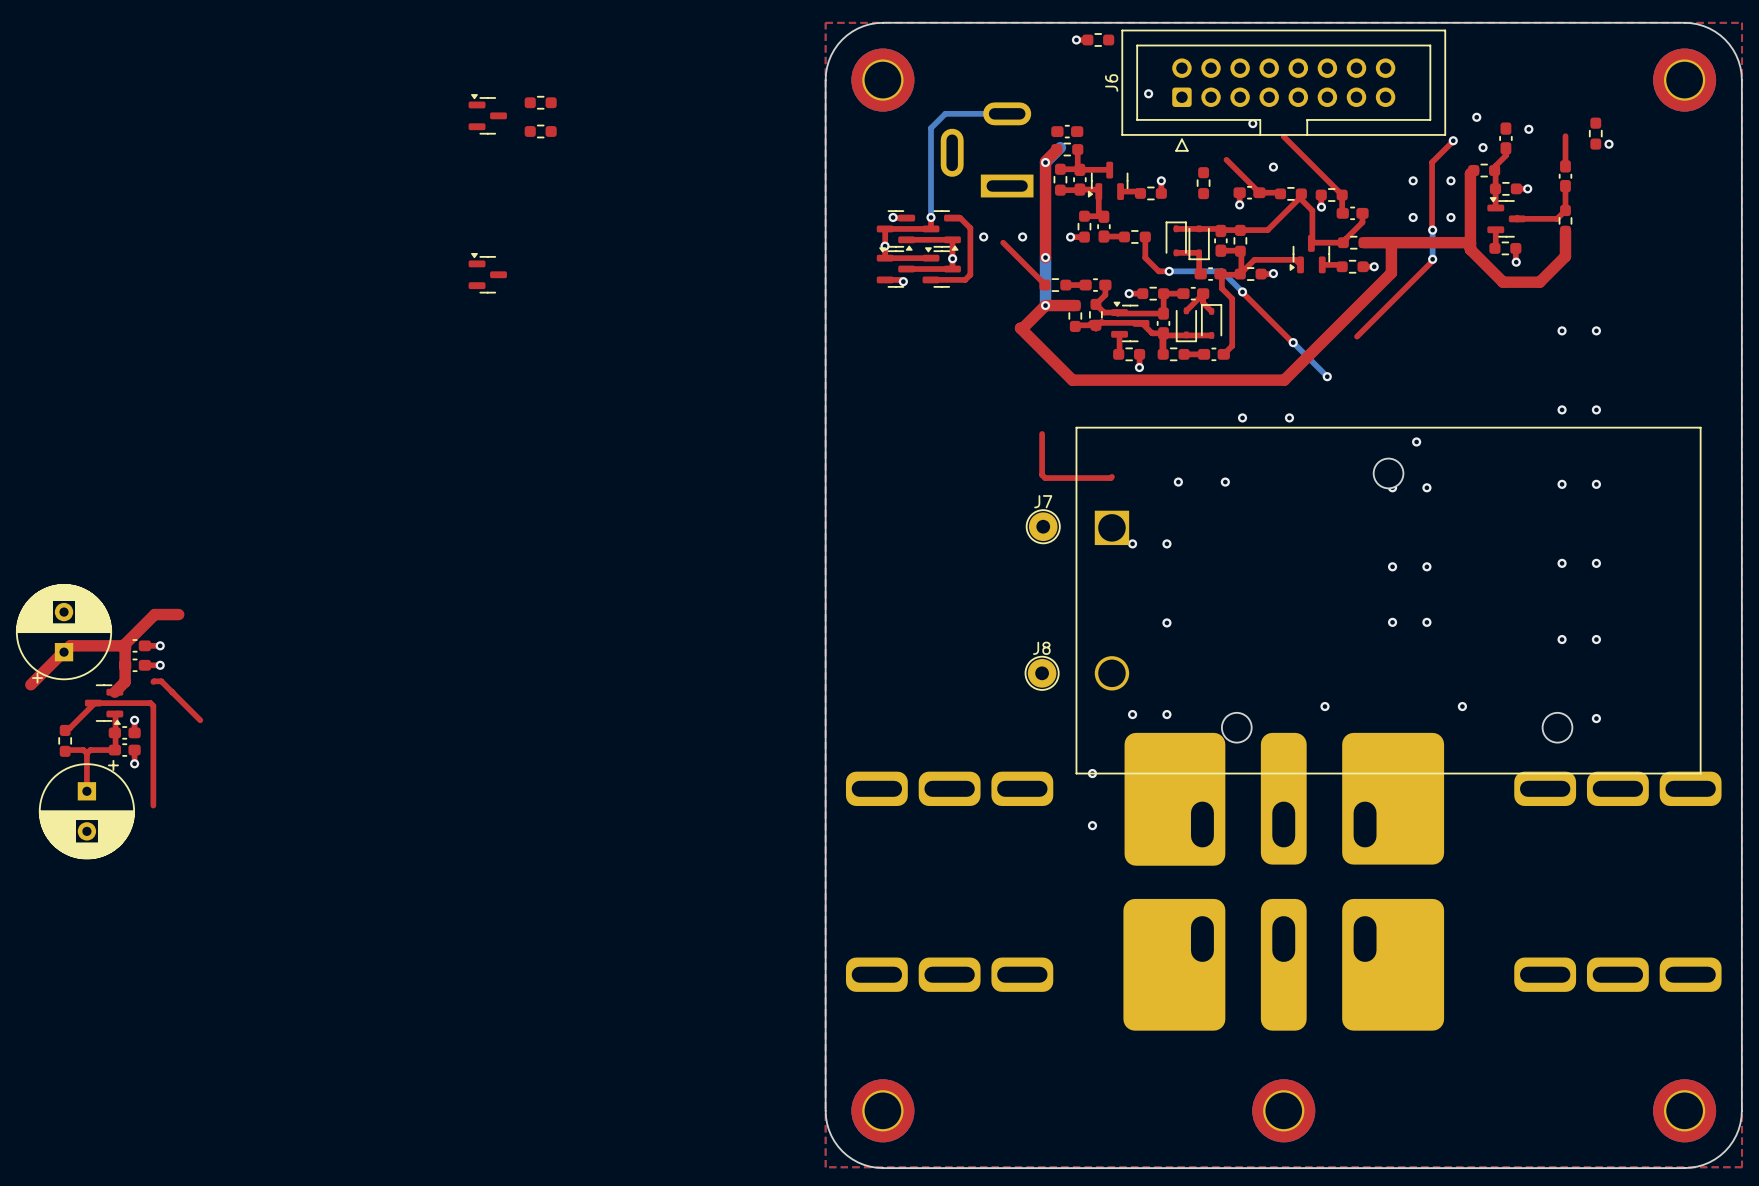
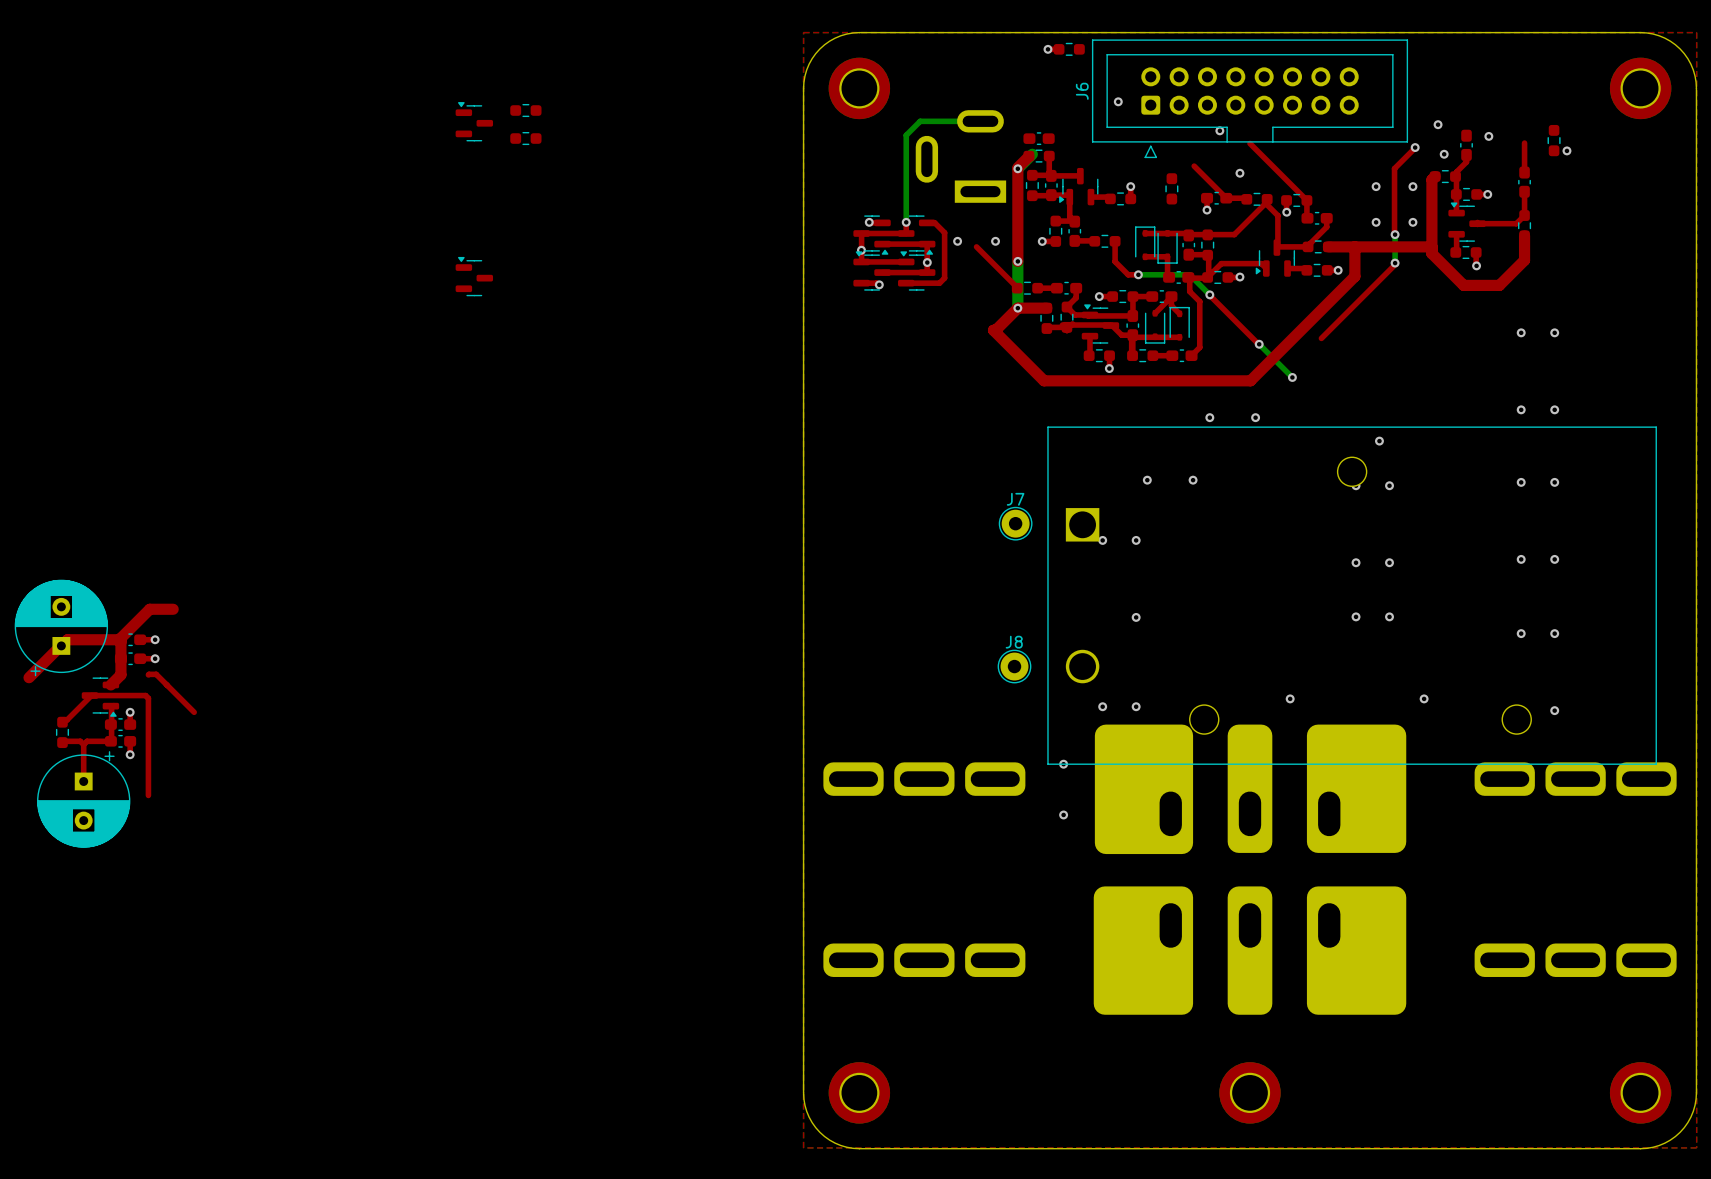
top track: (1042, 433) (1042, 474) (1045, 478) (1111, 476) -> none

